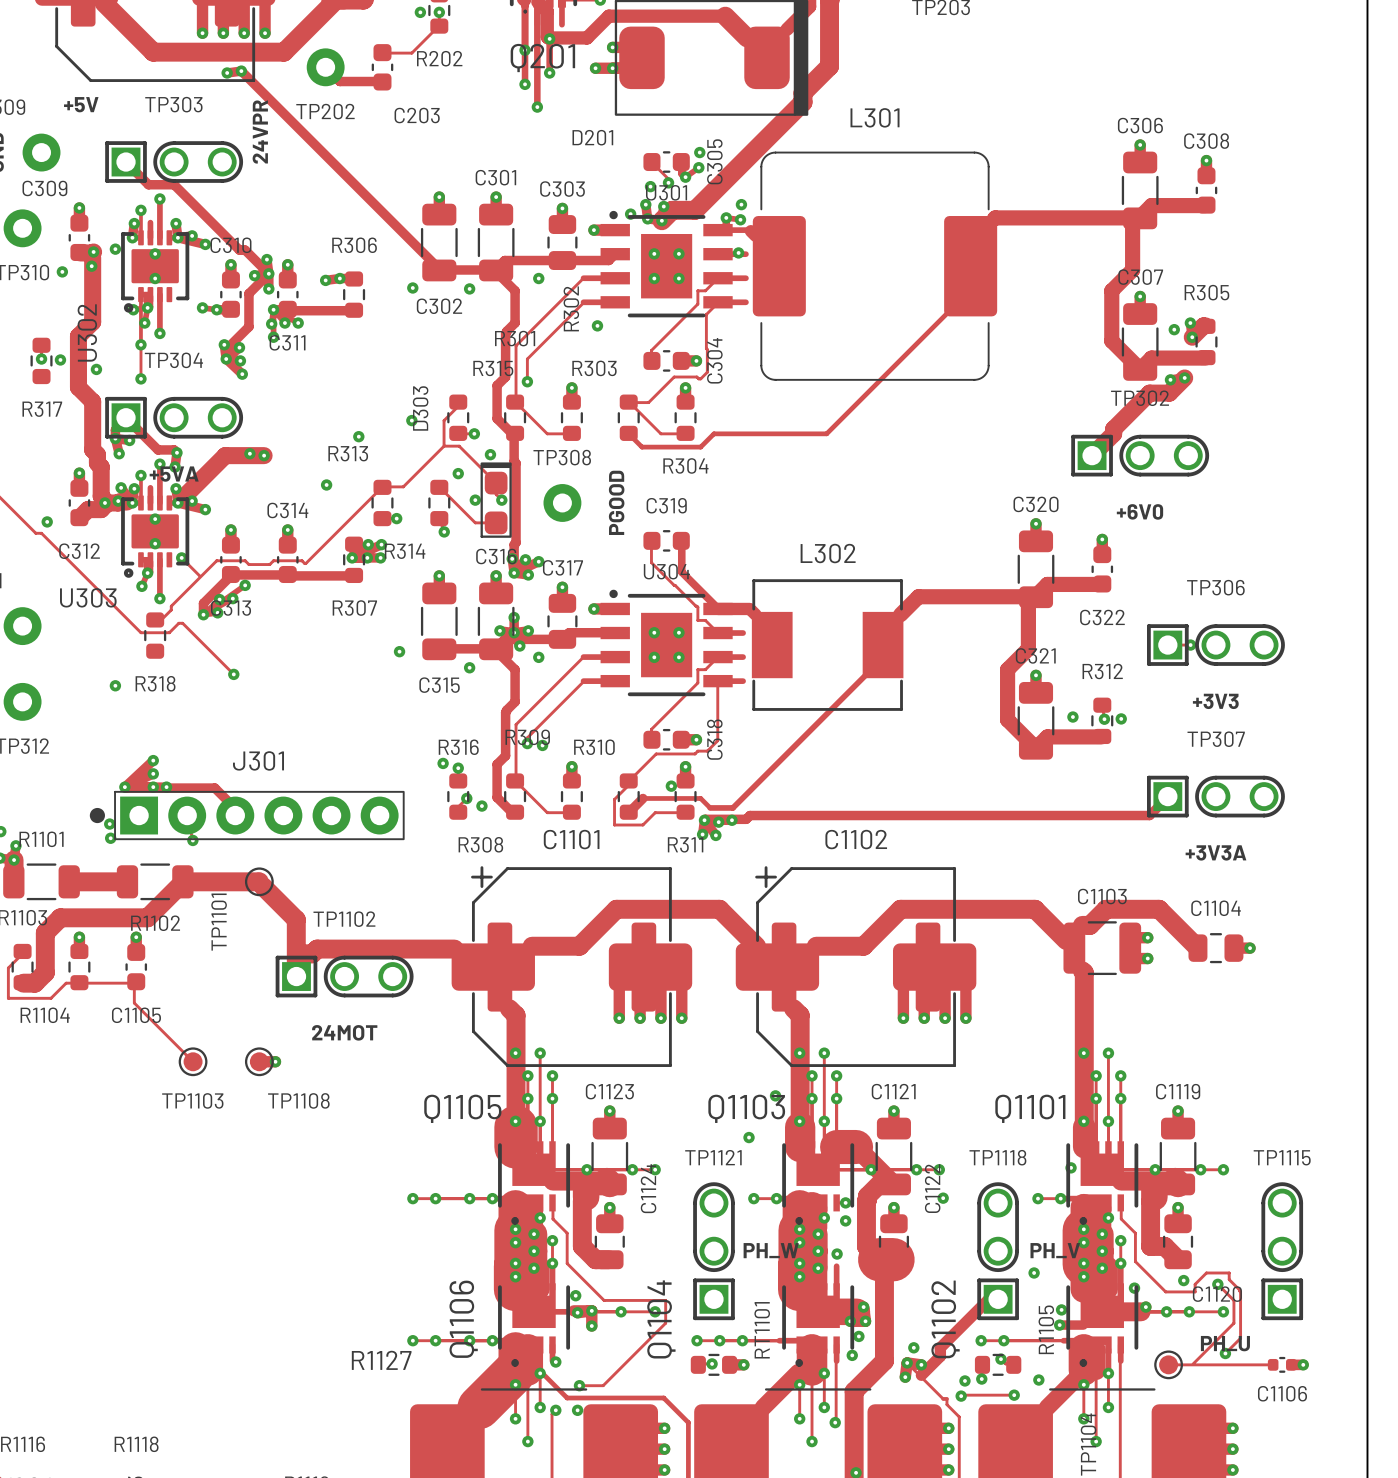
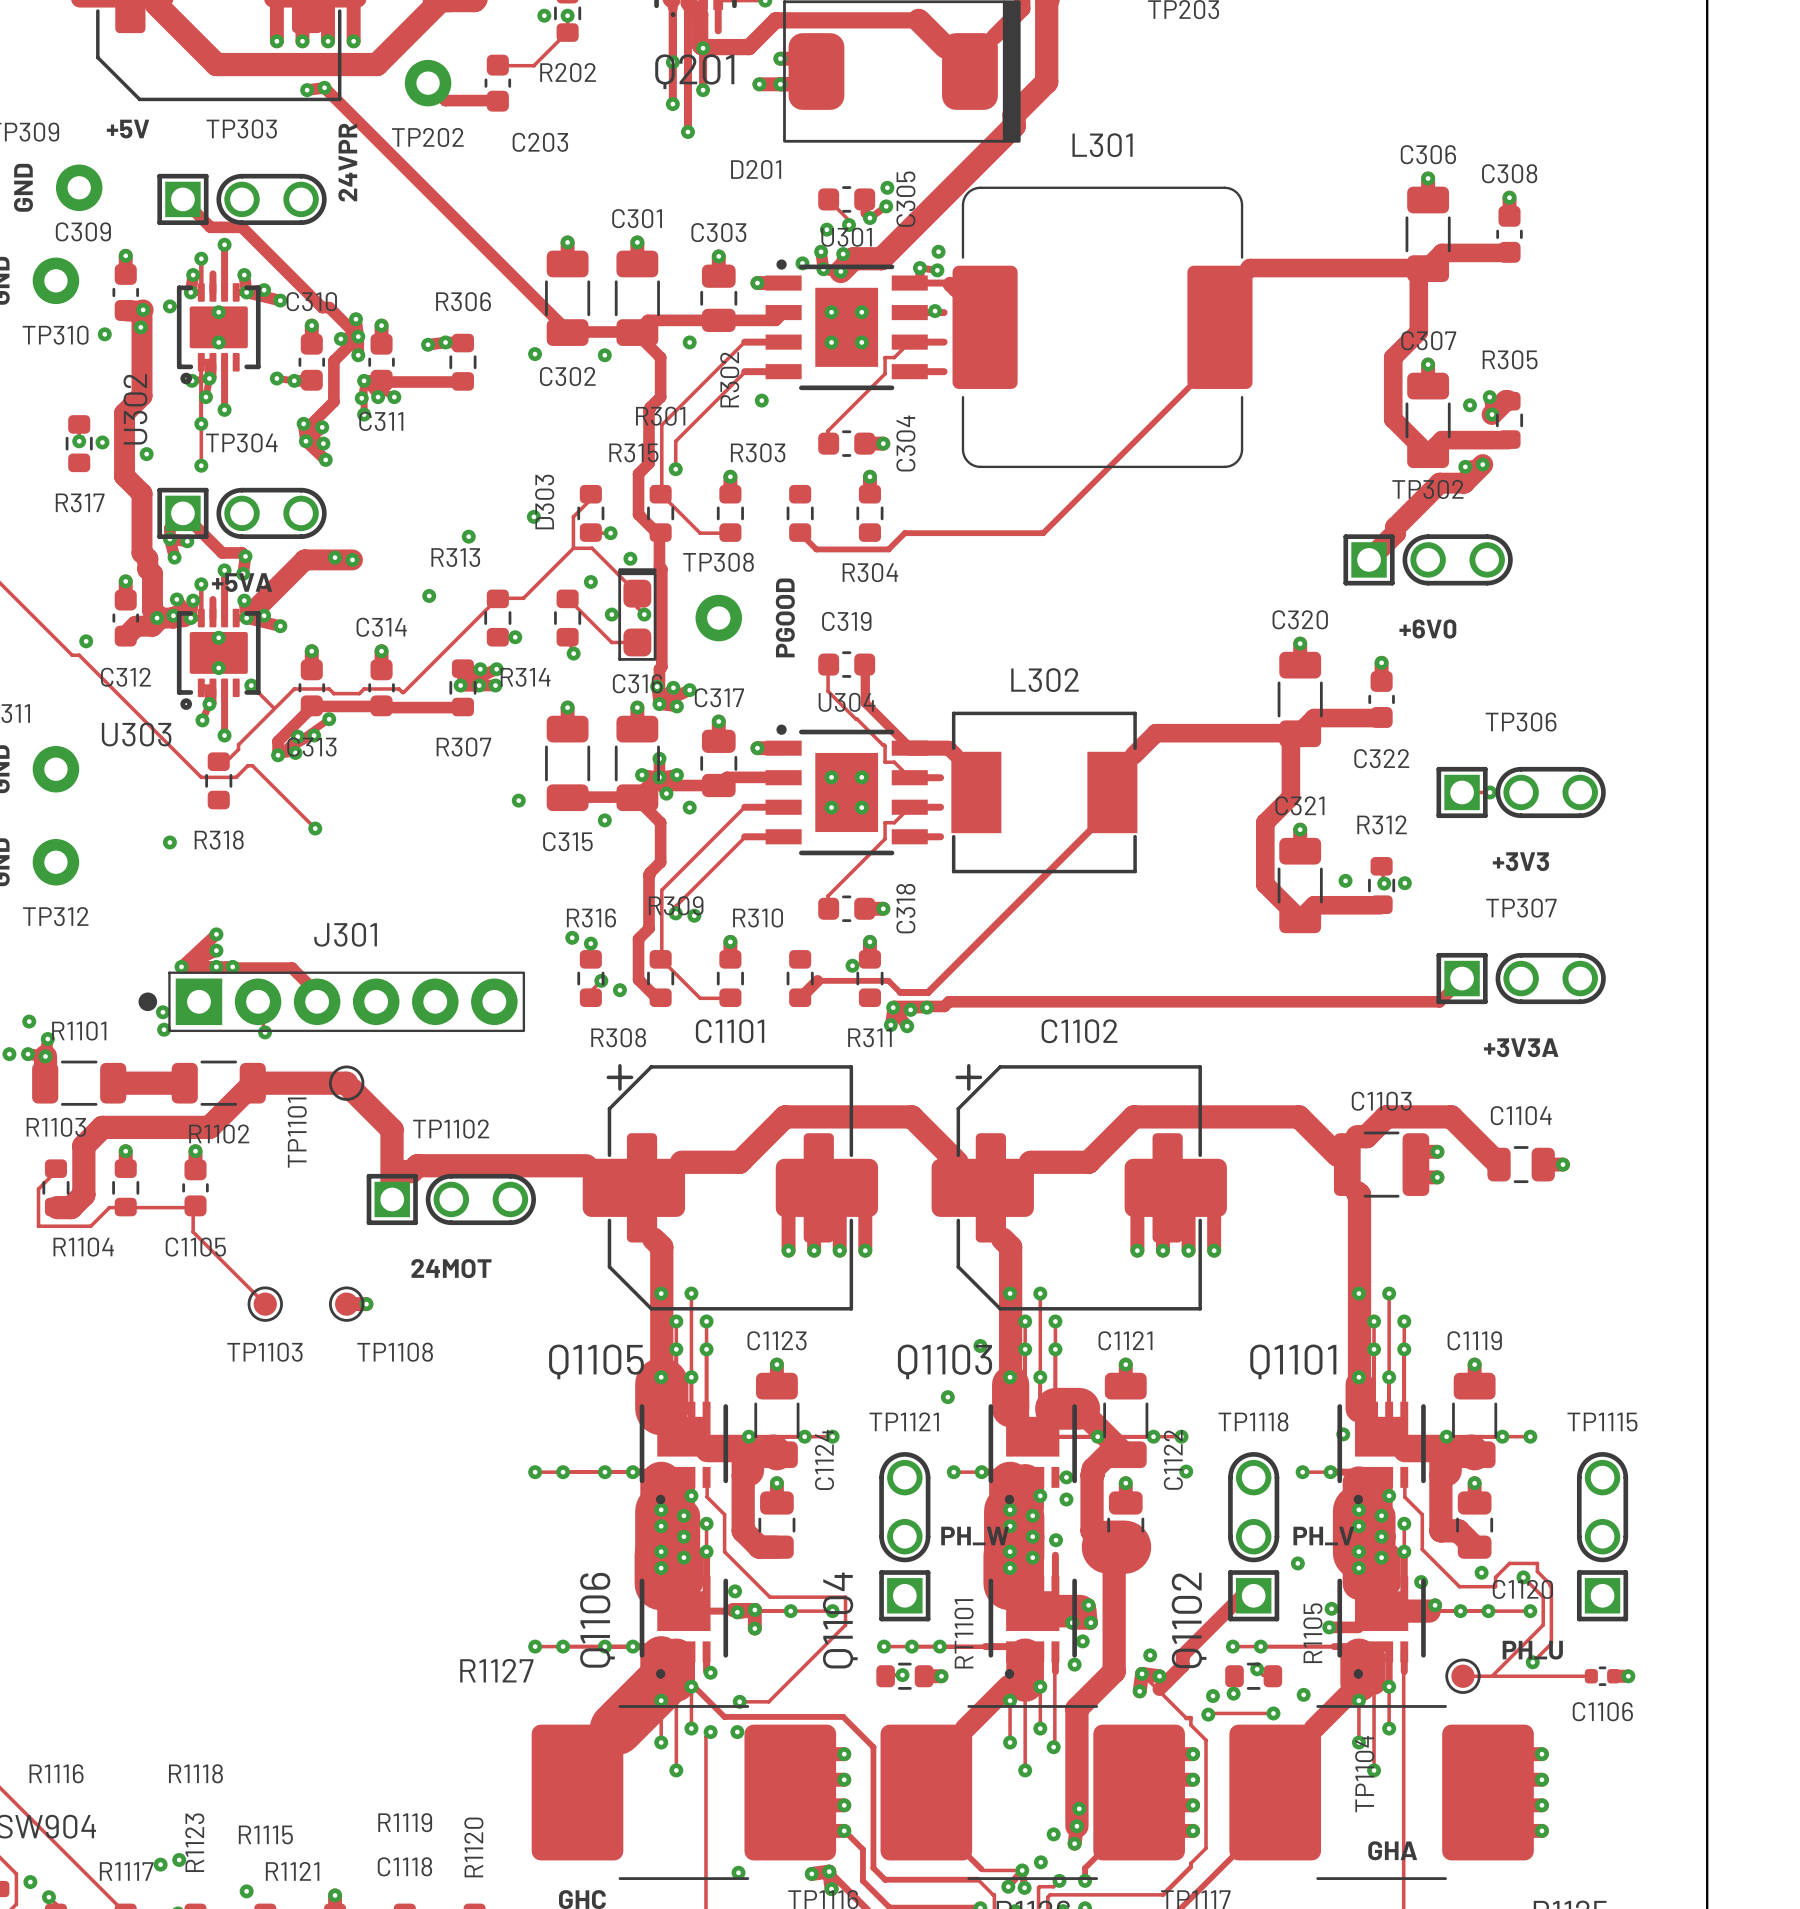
track: (716, 304) (706, 314) (707, 372) (700, 378) (696, 377) (674, 377) (648, 402) (631, 402) -> none
track: (629, 402) (660, 433) (684, 433) -> none
track: (717, 682) (717, 740) (707, 751) (697, 751) (695, 753) (656, 753) (629, 780) -> none
track: (628, 781) (628, 785) (614, 799) (614, 825) (642, 825) (655, 812) (684, 812) -> none

